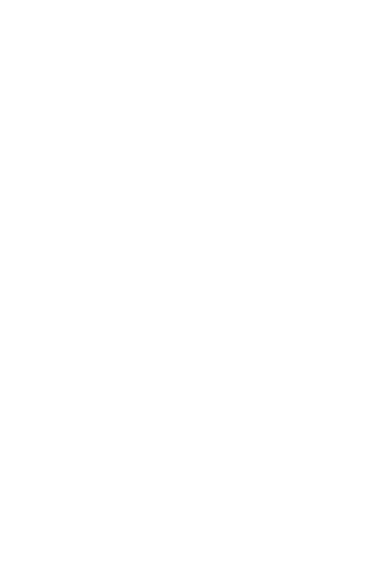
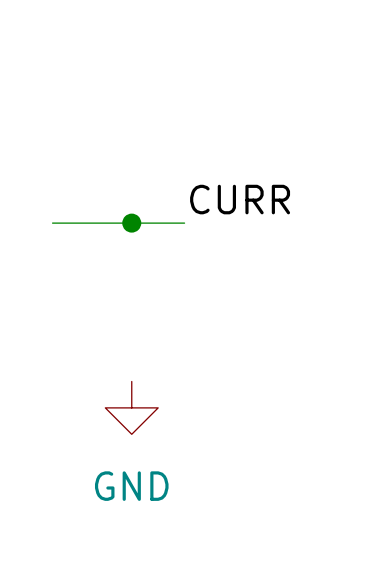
label: none -> CURR (240, 199)
wire: none -> (52, 223) (184, 223)
junction: none -> (131, 223)
power symbol: none -> GND (131, 407)

